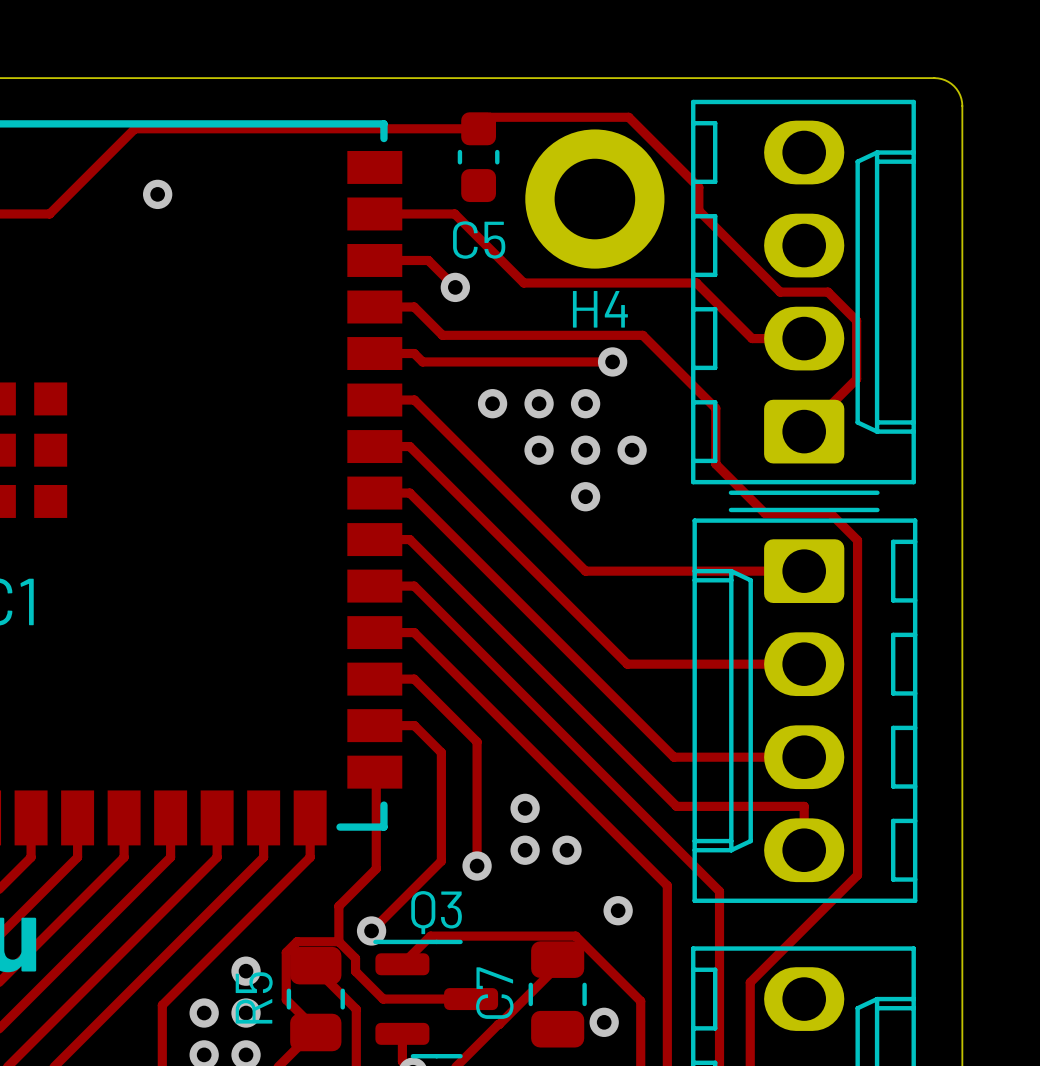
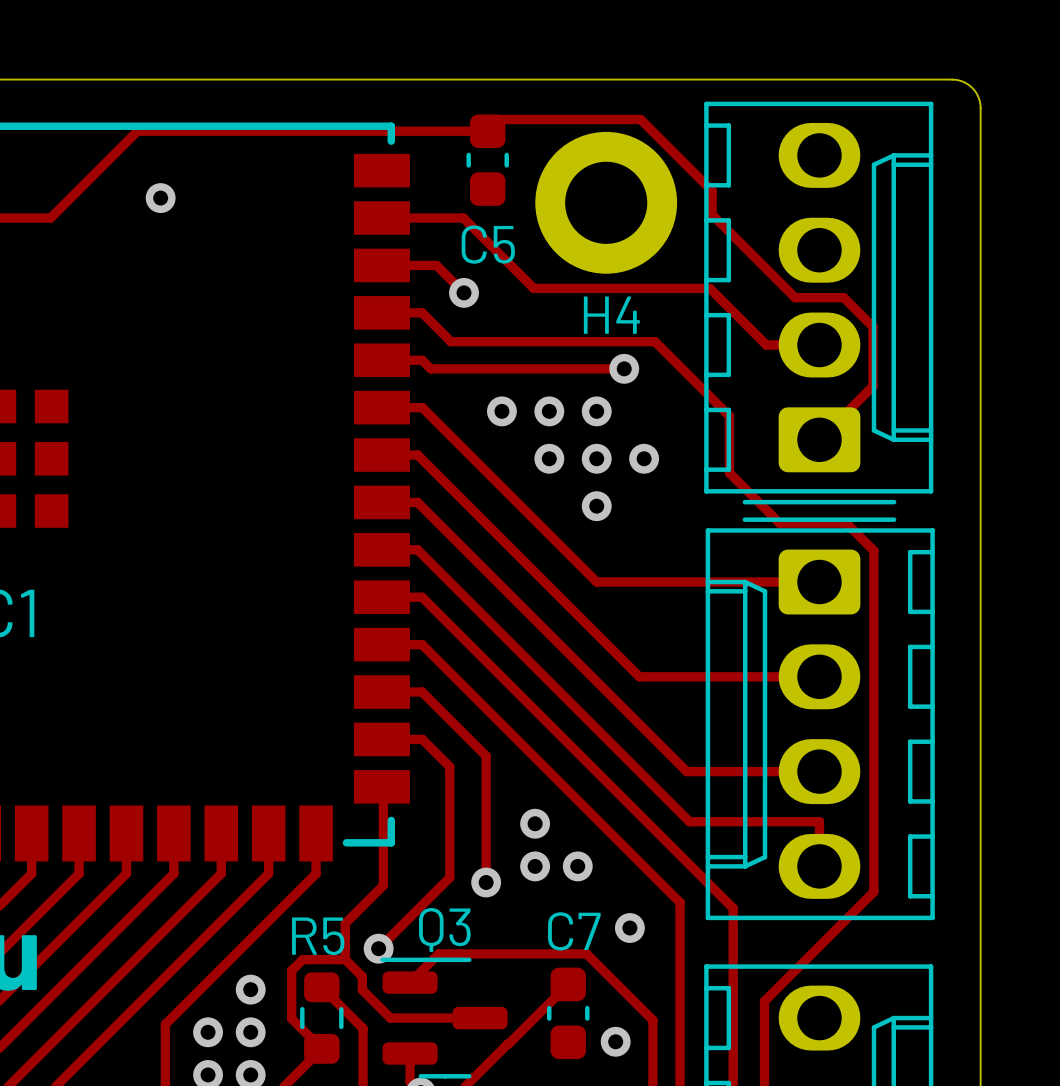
C7 footprint: [528, 941, 587, 1048] -> [547, 967, 590, 1060]
R5 footprint: [286, 946, 345, 1052] -> [300, 972, 344, 1064]
C7 name rotation: 0° (494, 993) -> 90° clockwise (574, 931)
C7 name position: C7 (494, 993) -> C7 (574, 931)
R5 name rotation: 0° (254, 997) -> 90° clockwise (318, 936)
R5 name position: R5 (254, 997) -> R5 (318, 936)

